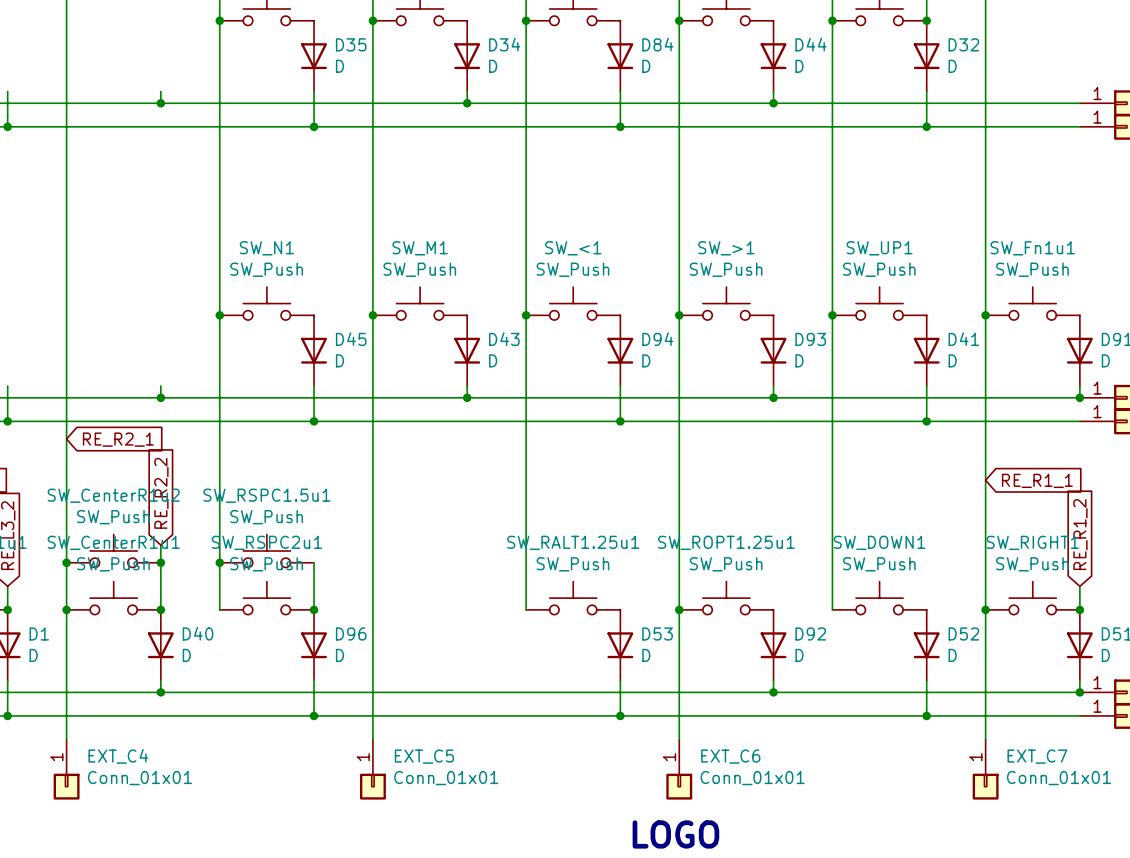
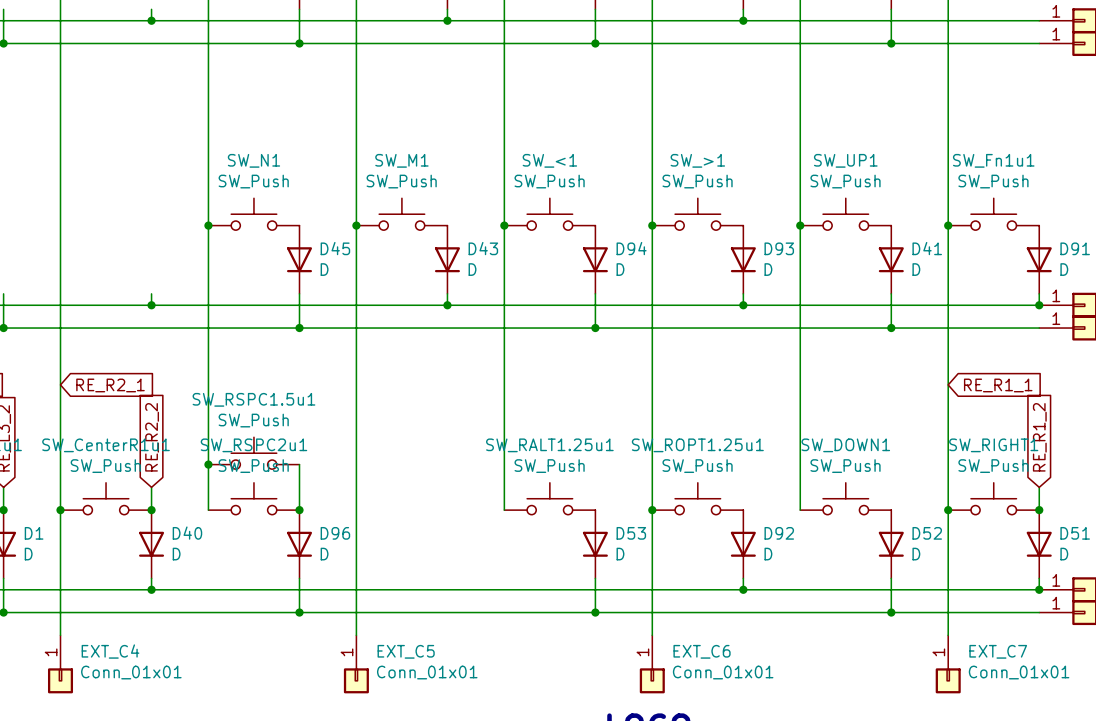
global label position: RE_R2_1 (118, 439) -> RE_R2_1 (110, 385)
global label position: RE_R2_2 (161, 493) -> RE_R2_2 (152, 437)
wire: (160, 545) (160, 586) -> none
SW_CenterR1u2: SW_Push (113, 550) -> none
junction: (66, 562) -> none
junction: (160, 562) -> none

